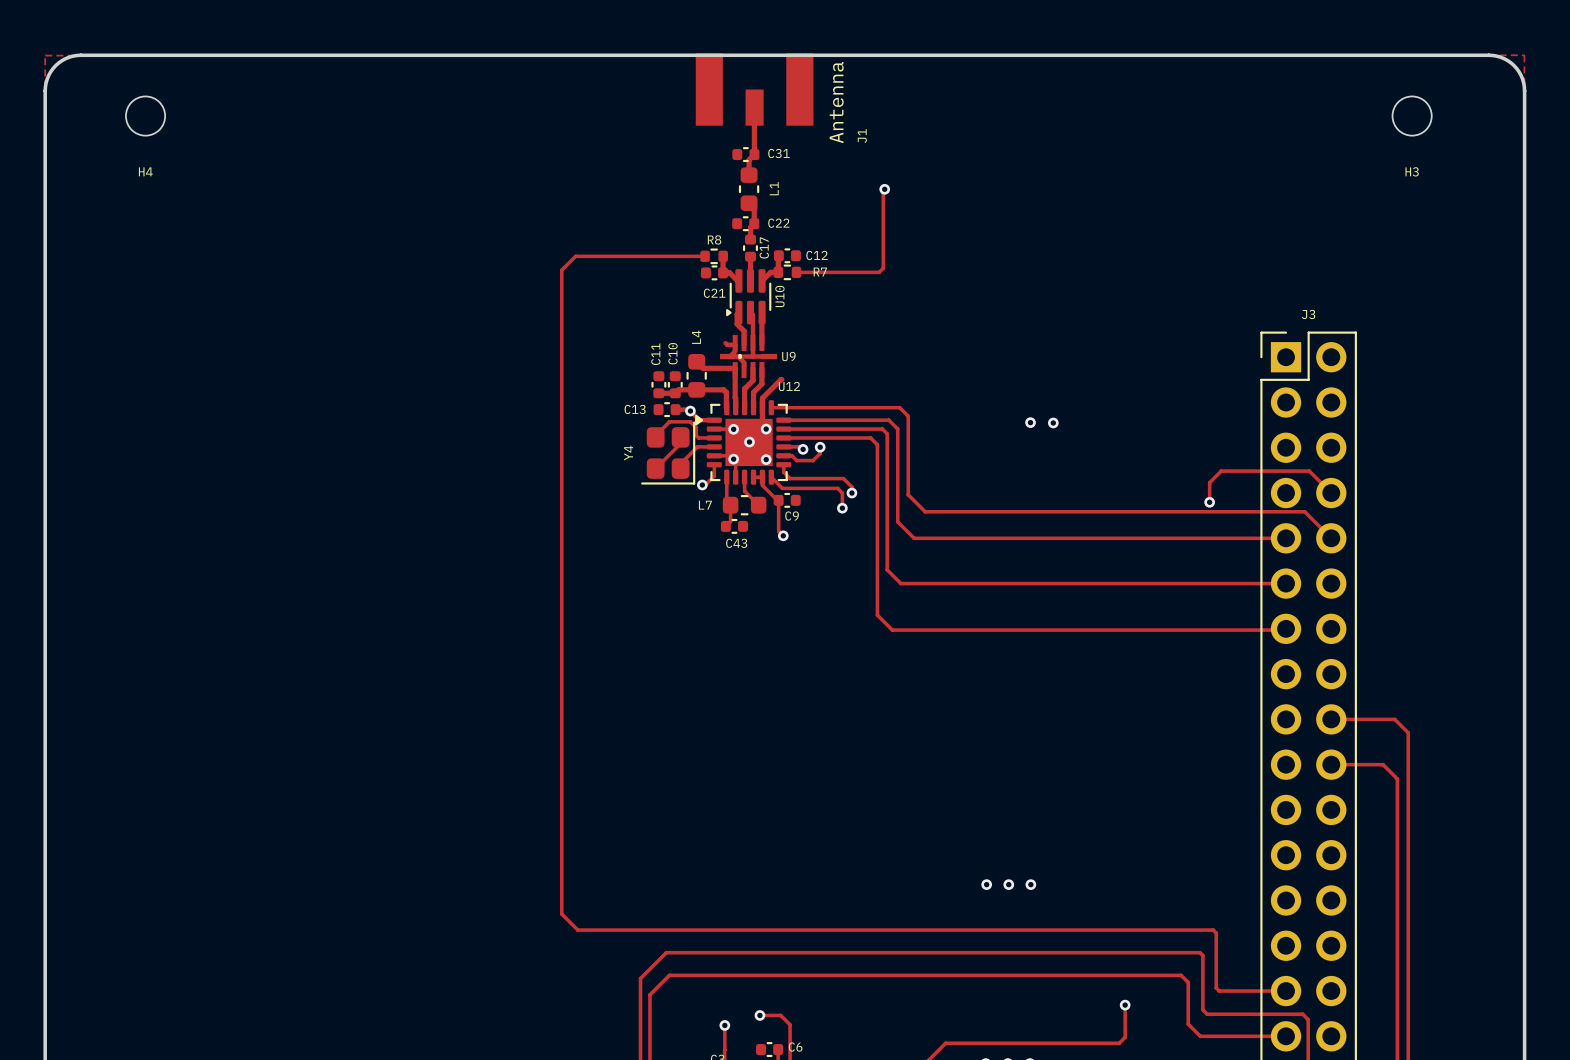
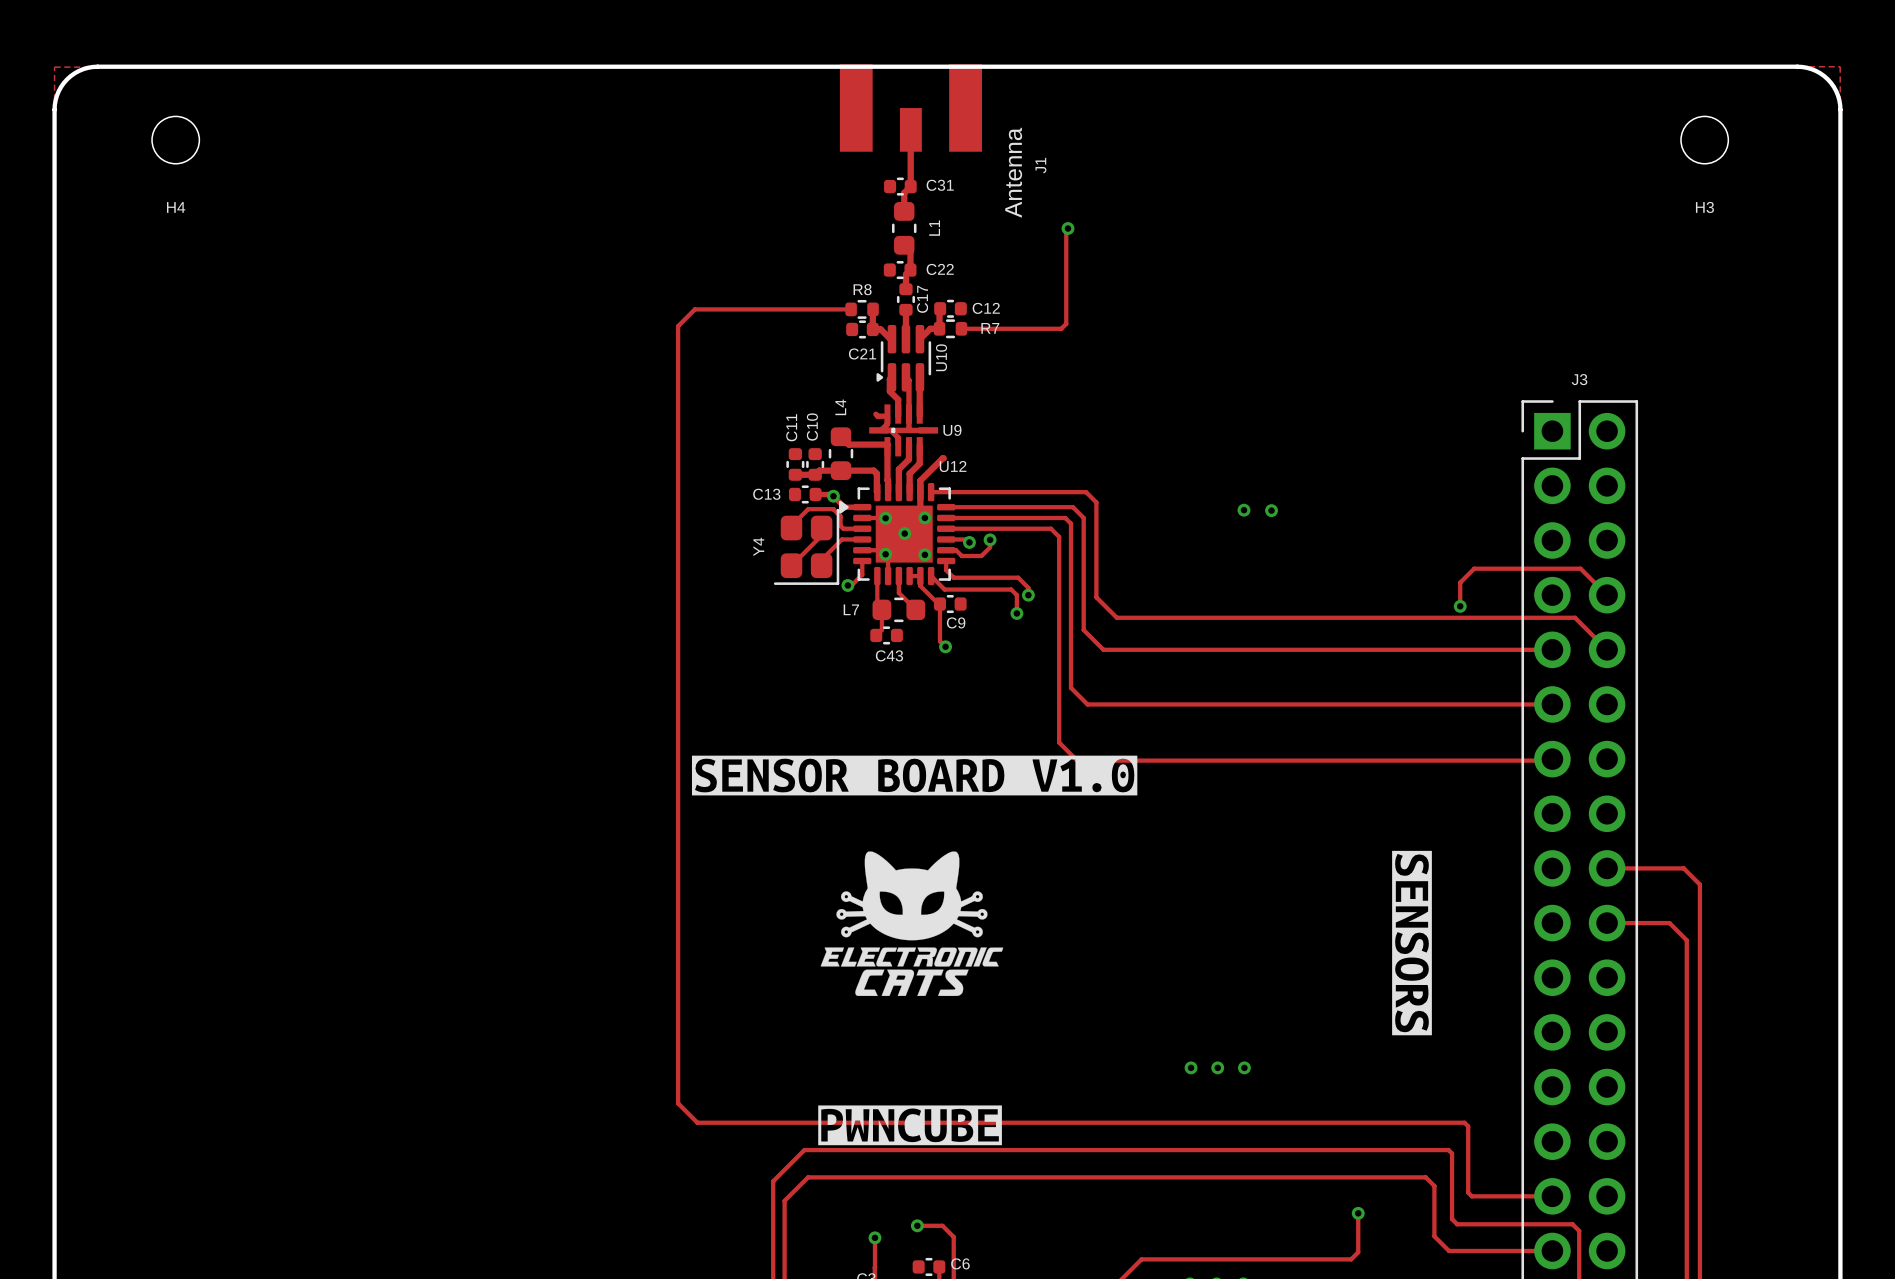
J1 value position: Antenna (836, 102) -> Antenna (1013, 172)
drawing: none -> [691, 755, 1138, 796]
drawing: none -> [1392, 850, 1432, 1036]
drawing: none -> [820, 851, 1004, 997]
drawing: none -> [818, 1105, 1002, 1146]

